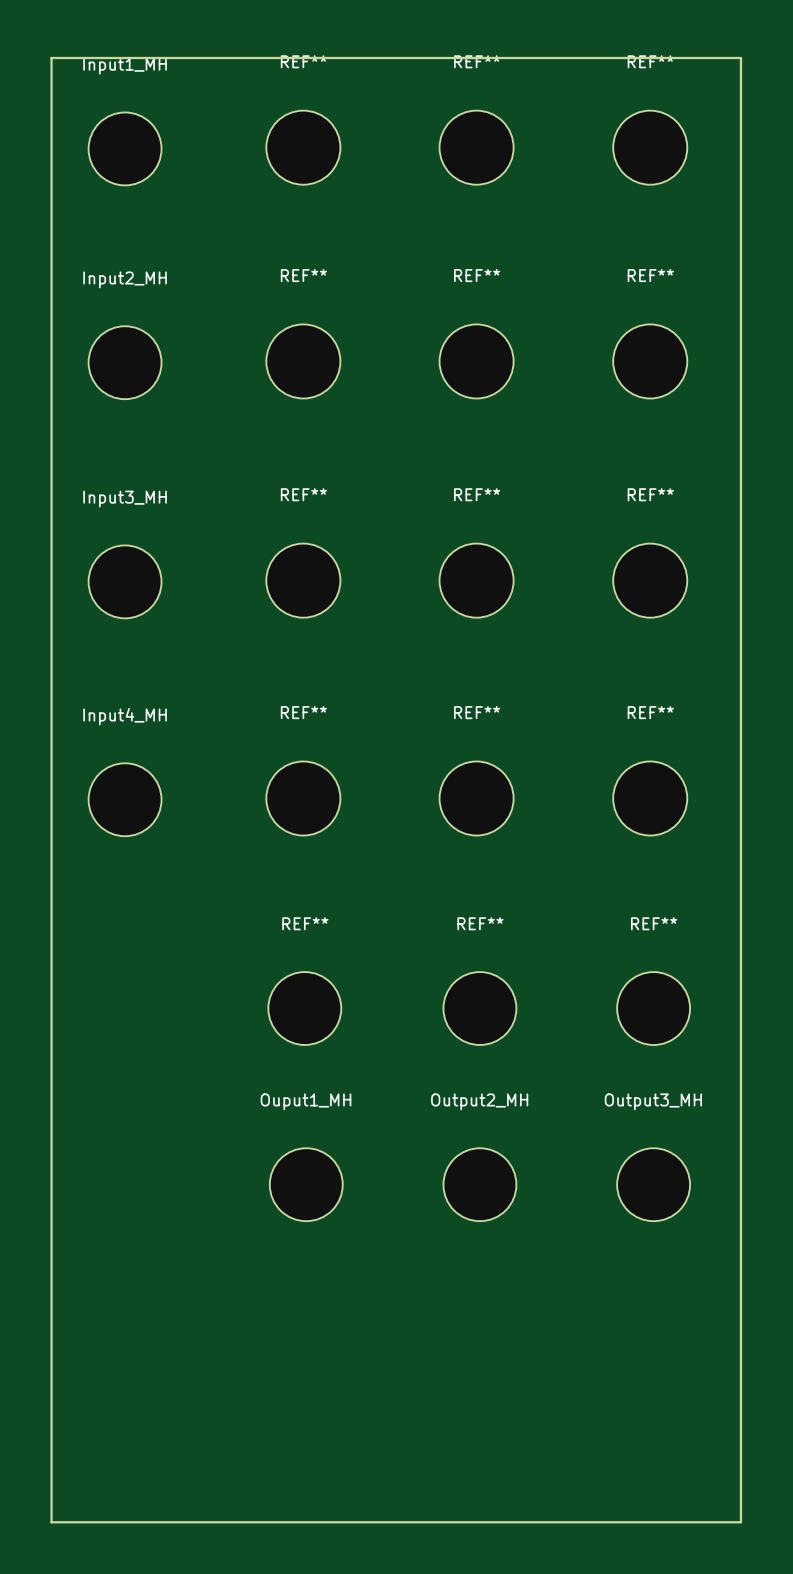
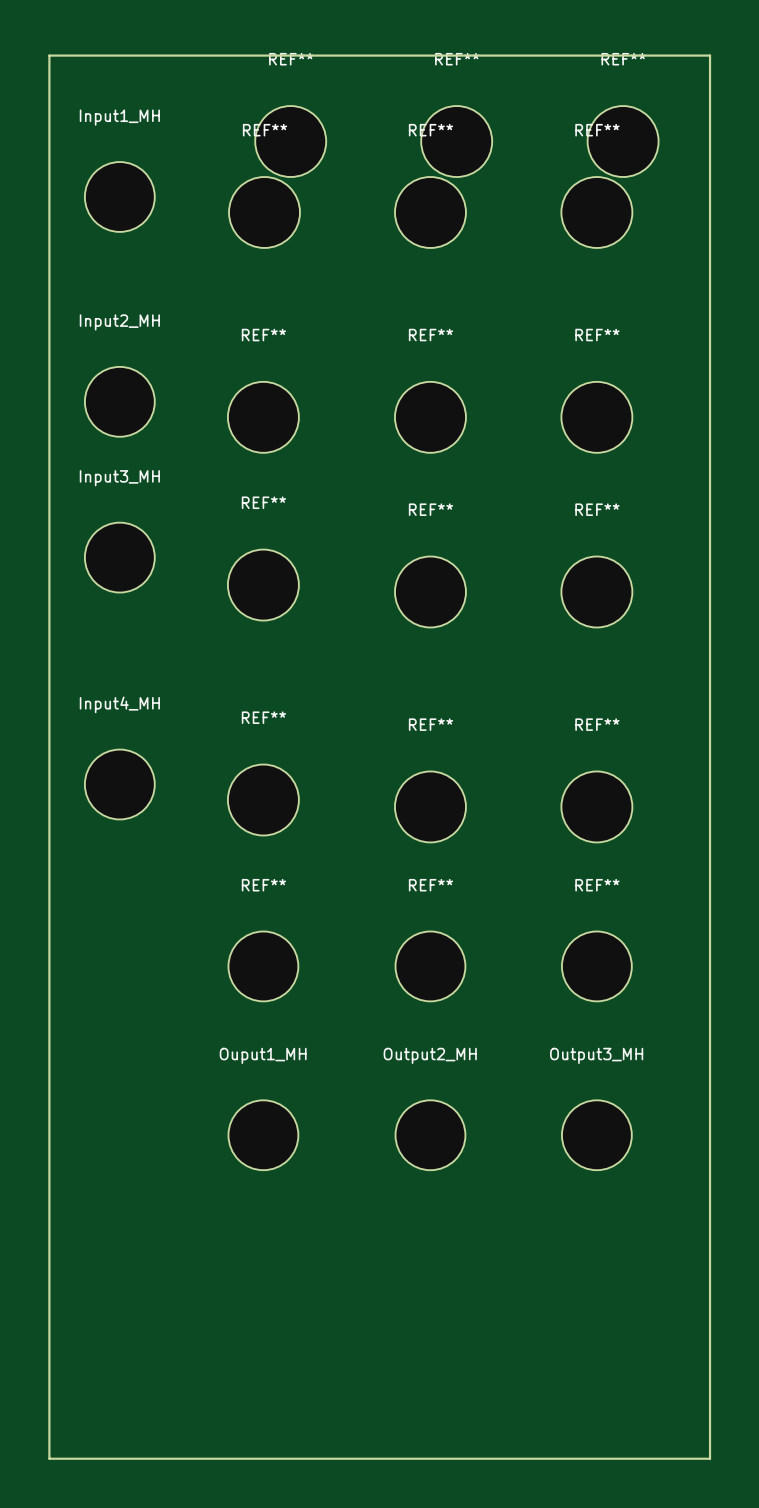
Input1_MH position: (125, 148) -> (119, 196)
REF**: none -> (264, 212)
REF**: none -> (430, 212)
REF**: none -> (596, 212)
REF**: (303, 361) -> none
REF**: (476, 361) -> none
REF**: (650, 361) -> none
Input2_MH position: (125, 362) -> (119, 401)
REF**: none -> (263, 417)
REF**: none -> (430, 417)
REF**: none -> (596, 417)
REF** position: (303, 580) -> (263, 585)
REF** position: (476, 580) -> (430, 592)
REF** position: (650, 580) -> (596, 592)
REF** position: (303, 798) -> (263, 800)
REF** position: (476, 798) -> (430, 806)
REF** position: (650, 798) -> (596, 806)
Input4_MH position: (125, 799) -> (119, 784)
REF** position: (304, 1008) -> (263, 966)
REF** position: (479, 1008) -> (430, 966)
REF** position: (653, 1008) -> (596, 966)
Ouput1_MH position: (306, 1184) -> (263, 1135)
Output2_MH position: (479, 1184) -> (430, 1135)
Output3_MH position: (653, 1184) -> (596, 1135)

